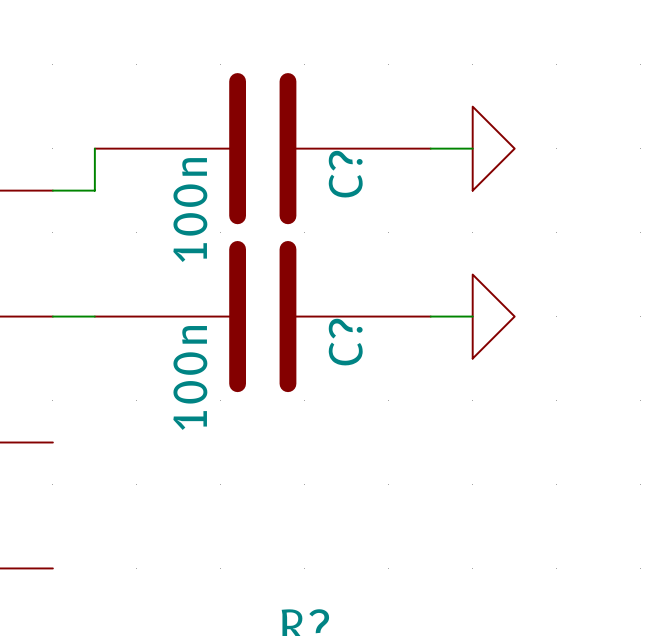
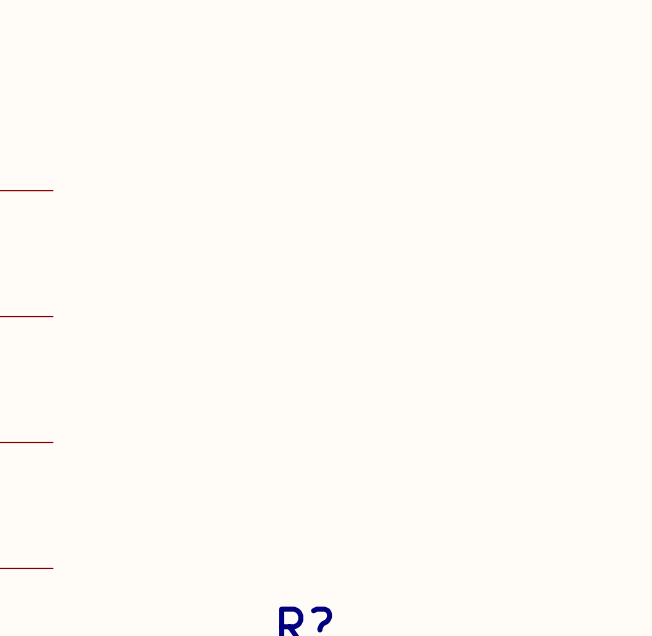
wire: (94, 148) (94, 190) (52, 190) -> none
C?: 100n (262, 148) -> none
wire: (430, 148) (472, 148) -> none
power symbol: (493, 148) -> none
wire: (52, 316) (94, 316) -> none
C?: 100n (262, 316) -> none
wire: (430, 316) (472, 316) -> none
power symbol: (493, 316) -> none

